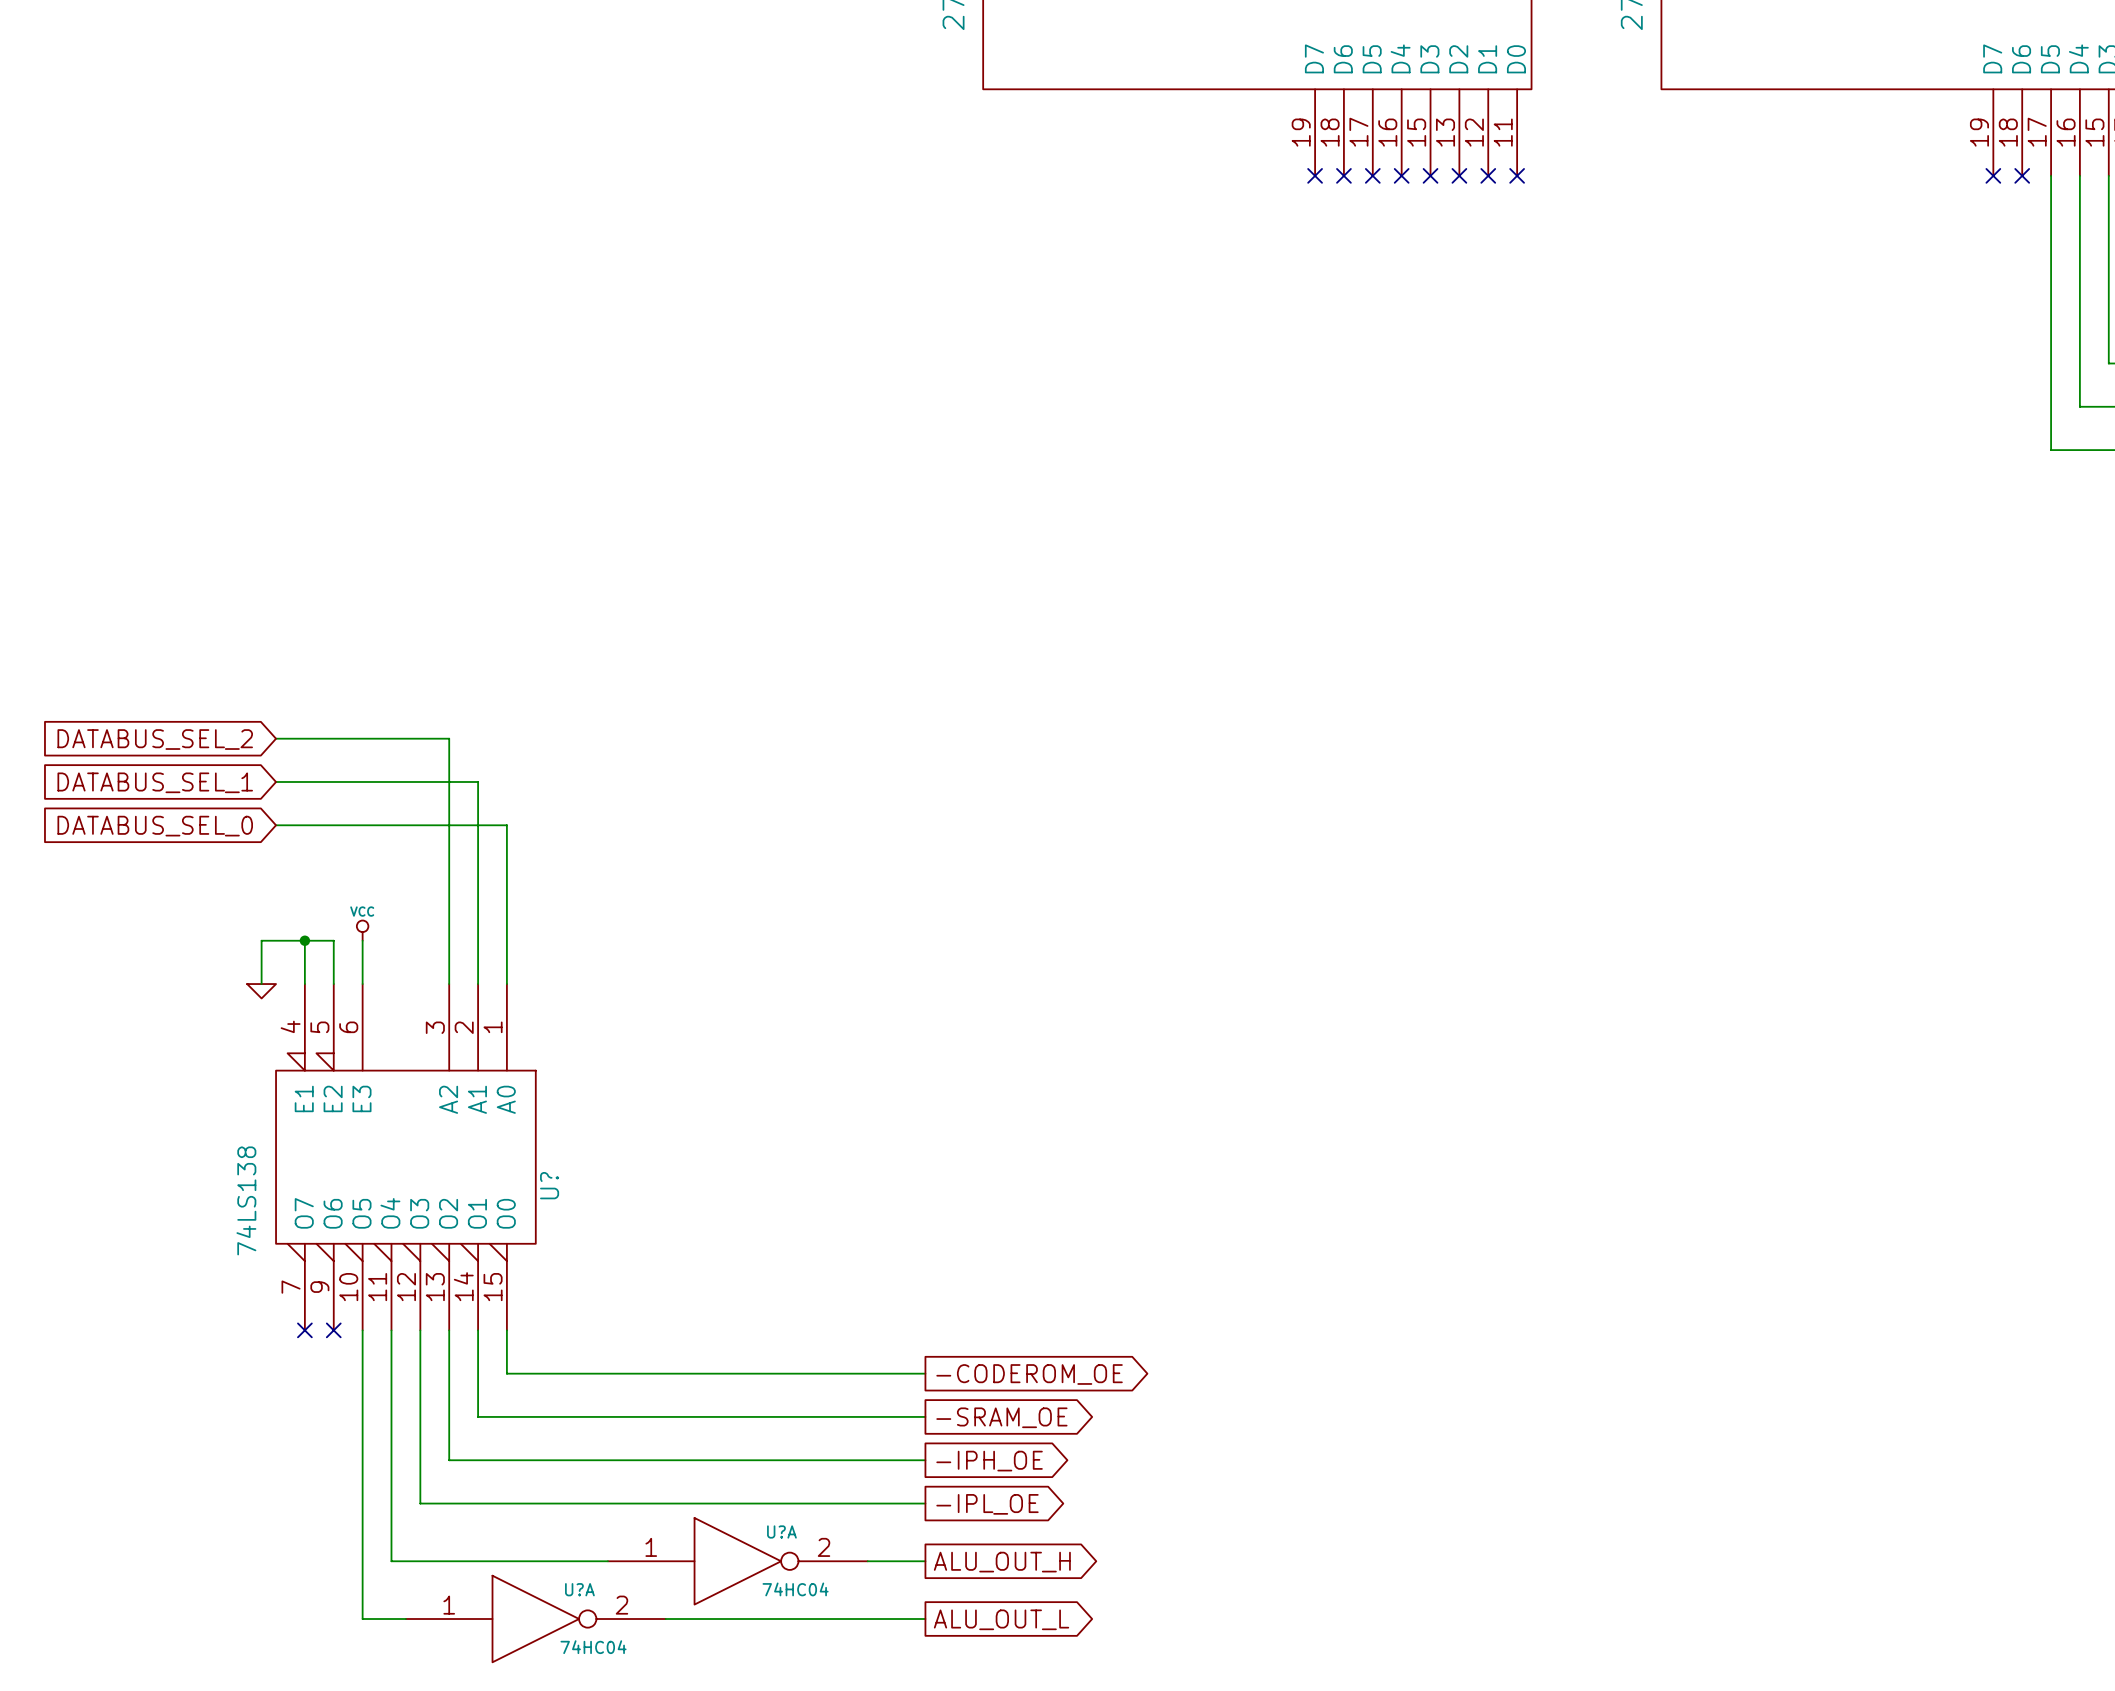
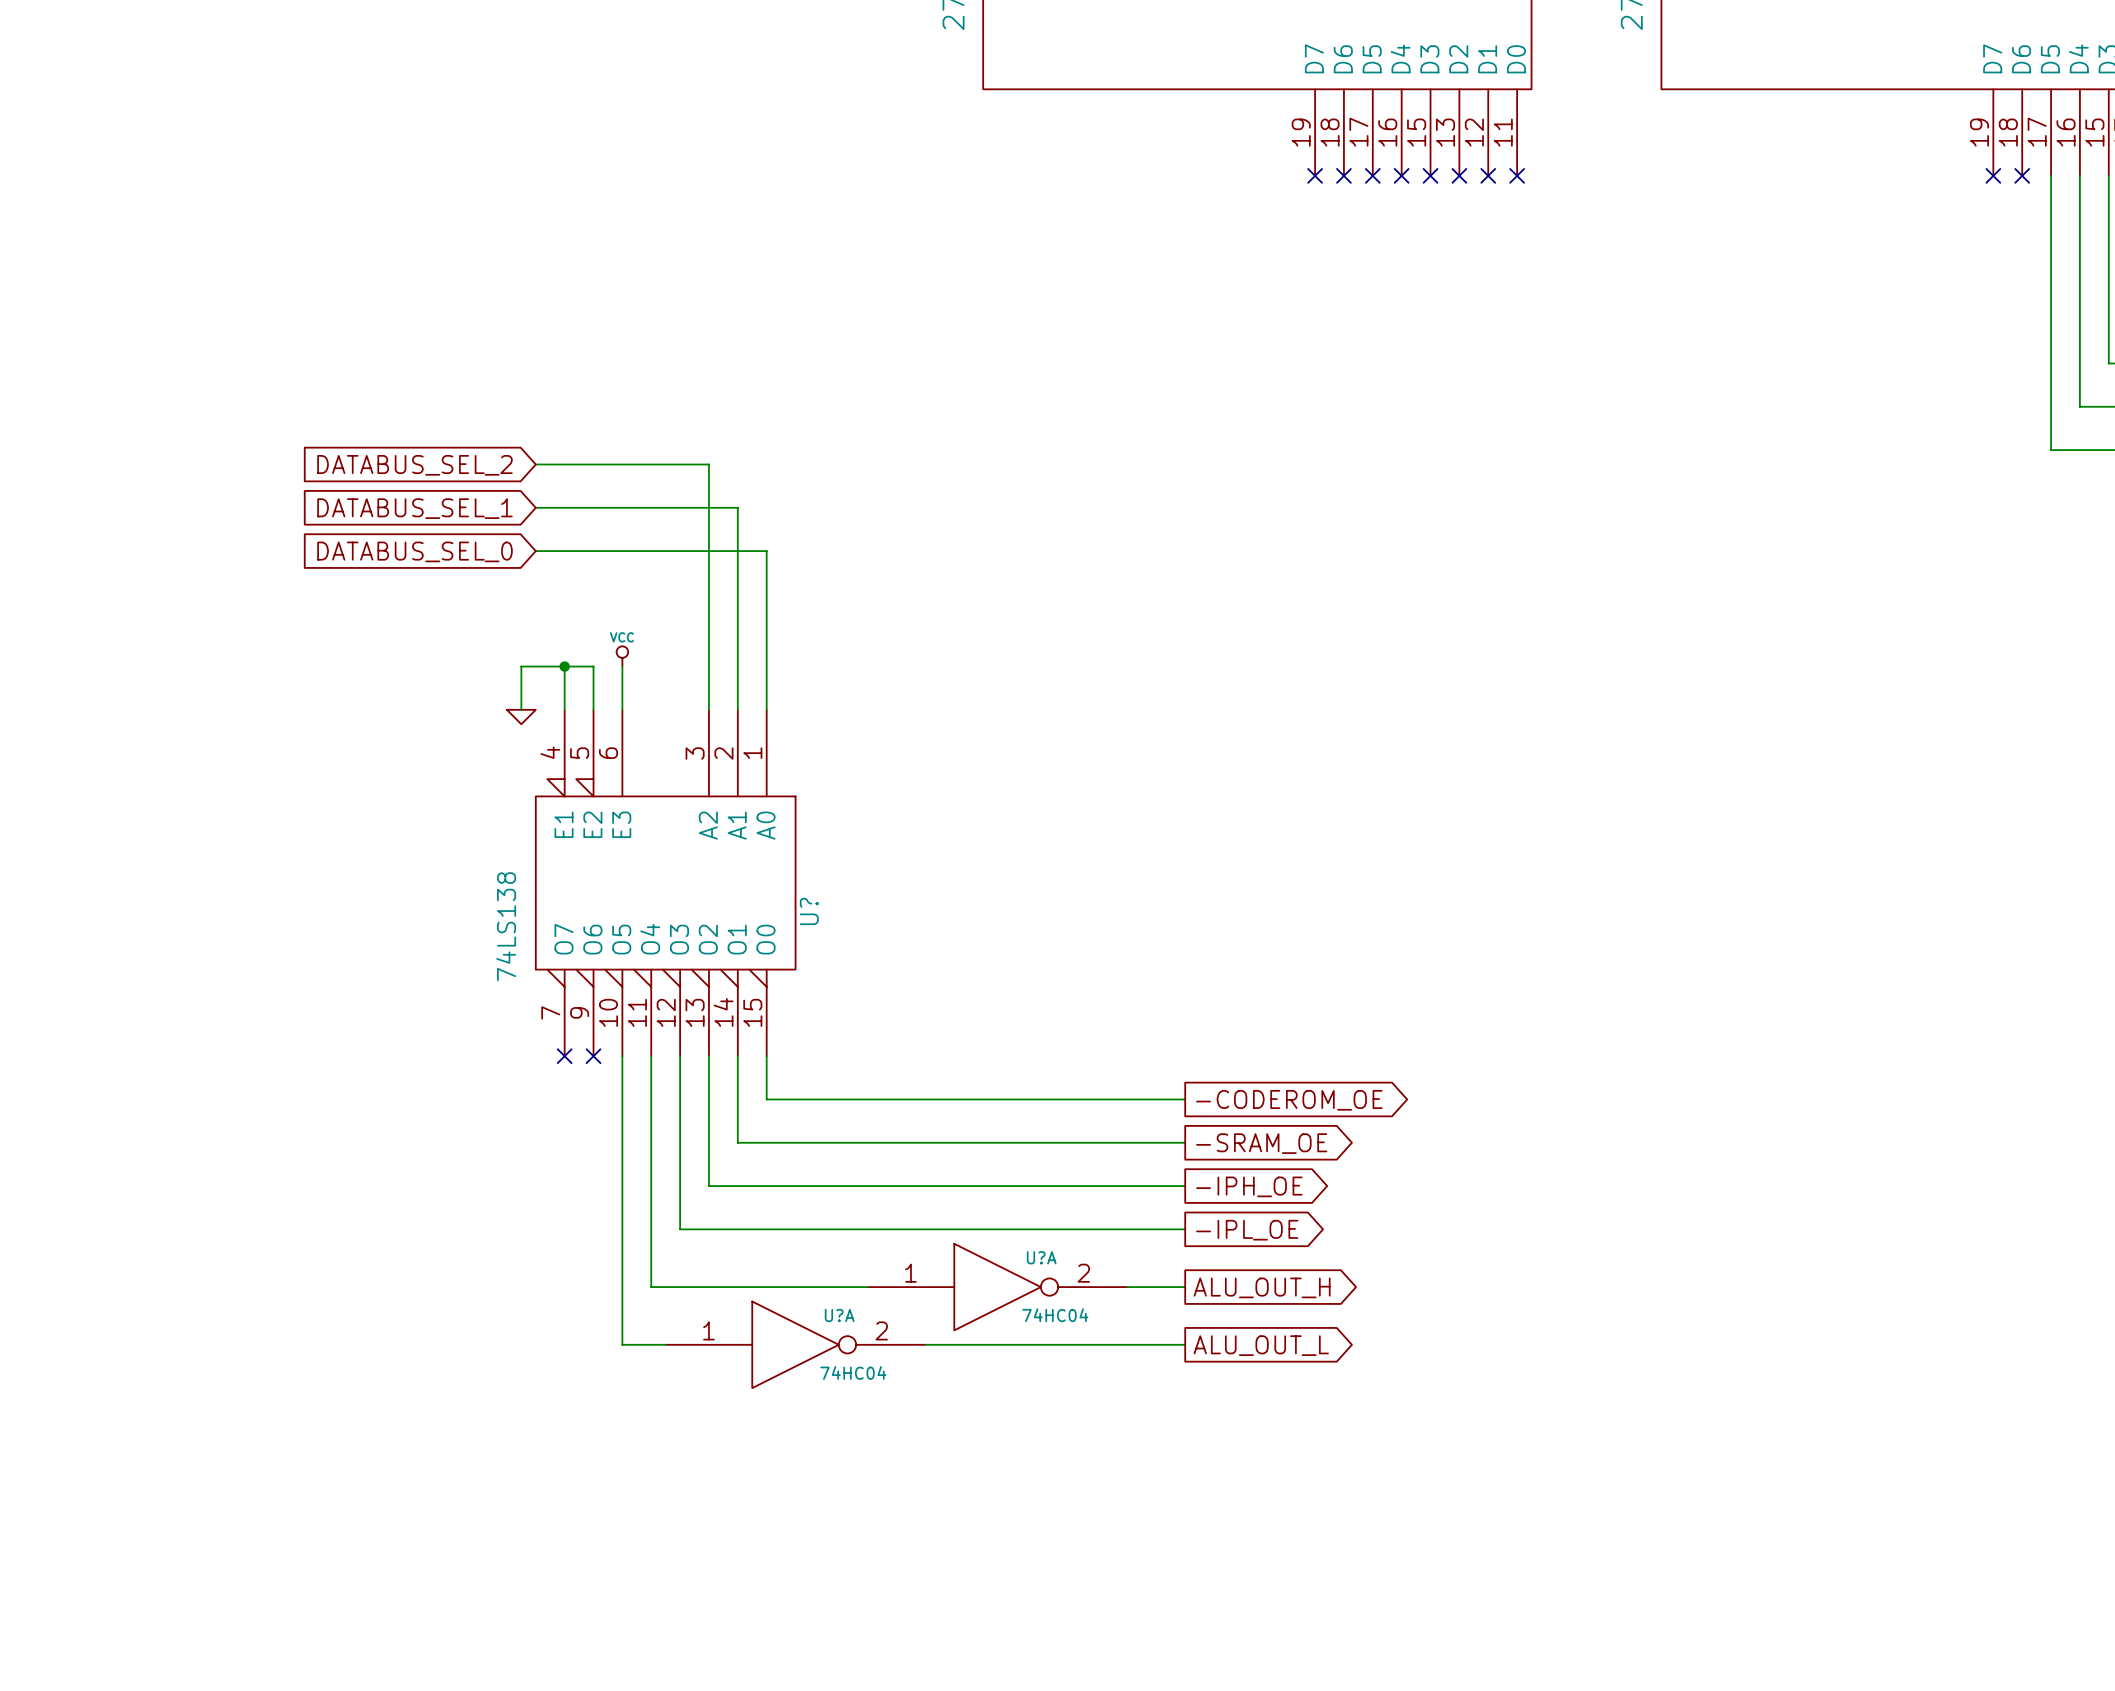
wire: none -> (535, 464) (708, 464) (708, 709)
global label: none -> DATABUS_SEL_2 (414, 465)
wire: none -> (535, 507) (737, 507) (737, 709)
global label: none -> DATABUS_SEL_1 (414, 508)
global label: none -> DATABUS_SEL_0 (414, 551)
wire: none -> (535, 551) (766, 551) (766, 709)
power symbol: none -> VCC (622, 656)
wire: none -> (564, 666) (564, 709)
junction: none -> (564, 666)
wire: none -> (622, 666) (622, 709)
wire: none -> (521, 709) (521, 666) (593, 666) (593, 709)
power symbol: none -> (521, 717)
wire: (276, 738) (449, 738) (449, 984) -> none
global label: DATABUS_SEL_2 (155, 739) -> none
wire: (276, 781) (478, 781) (478, 984) -> none
global label: DATABUS_SEL_1 (155, 782) -> none
wire: (276, 825) (506, 825) (506, 984) -> none
global label: DATABUS_SEL_0 (155, 826) -> none
U?: none -> 74LS138 (665, 883)
power symbol: VCC (362, 930) -> none
wire: (304, 940) (304, 984) -> none
junction: (304, 940) -> none
wire: (362, 940) (362, 984) -> none
wire: (261, 984) (261, 940) (333, 940) (333, 984) -> none
power symbol: (261, 991) -> none
no-connect mark: none -> (564, 1056)
no-connect mark: none -> (593, 1056)
wire: none -> (622, 1056) (622, 1344) (665, 1344)
wire: none -> (651, 1056) (651, 1287) (867, 1287)
wire: none -> (680, 1056) (680, 1229) (1185, 1229)
wire: none -> (708, 1056) (708, 1186) (1185, 1186)
wire: none -> (737, 1056) (737, 1142) (1185, 1142)
wire: none -> (766, 1056) (766, 1099) (1185, 1099)
global label: none -> -CODEROM_OE (1289, 1100)
global label: none -> -SRAM_OE (1261, 1143)
U?: 74LS138 (405, 1157) -> none
global label: none -> -IPH_OE (1249, 1186)
global label: none -> -IPL_OE (1247, 1230)
U?A: none -> 74HC04 (997, 1287)
wire: none -> (1127, 1287) (1185, 1287)
global label: none -> ALU_OUT_H (1262, 1287)
no-connect mark: (304, 1330) -> none
no-connect mark: (333, 1330) -> none
wire: (362, 1330) (362, 1619) (405, 1619) -> none
wire: (391, 1330) (391, 1561) (607, 1561) -> none
wire: (420, 1330) (420, 1503) (925, 1503) -> none
wire: (449, 1330) (449, 1460) (925, 1460) -> none
wire: (478, 1330) (478, 1416) (925, 1416) -> none
wire: (506, 1330) (506, 1373) (925, 1373) -> none
U?A: none -> 74HC04 (795, 1344)
wire: none -> (925, 1344) (1185, 1344)
global label: none -> ALU_OUT_L (1261, 1345)
global label: -CODEROM_OE (1029, 1374) -> none
global label: -SRAM_OE (1001, 1417) -> none
global label: -IPH_OE (989, 1461) -> none
global label: -IPL_OE (987, 1504) -> none
U?A: 74HC04 (737, 1561) -> none
wire: (867, 1561) (925, 1561) -> none
global label: ALU_OUT_H (1002, 1562) -> none
U?A: 74HC04 (535, 1619) -> none
wire: (665, 1619) (925, 1619) -> none
global label: ALU_OUT_L (1001, 1619) -> none

